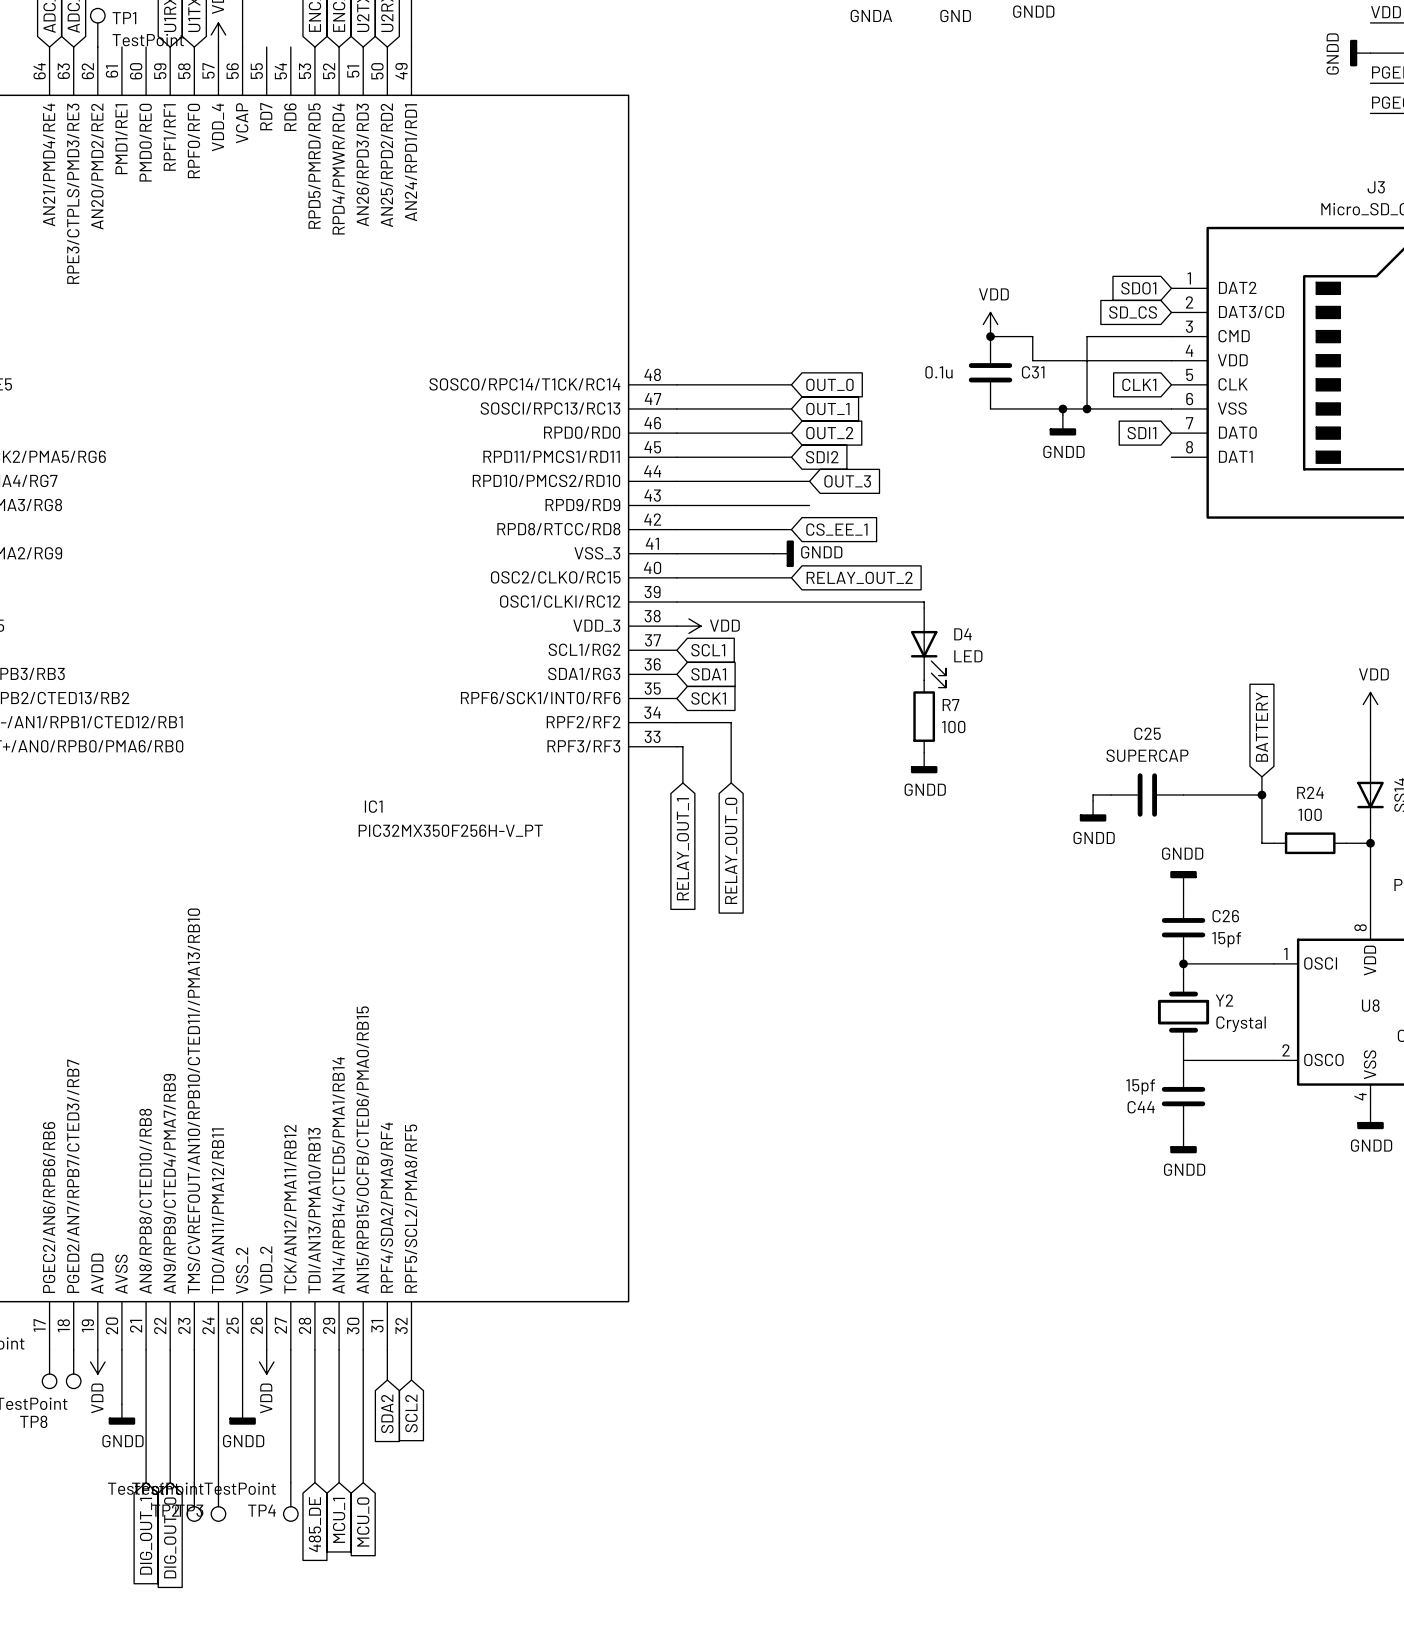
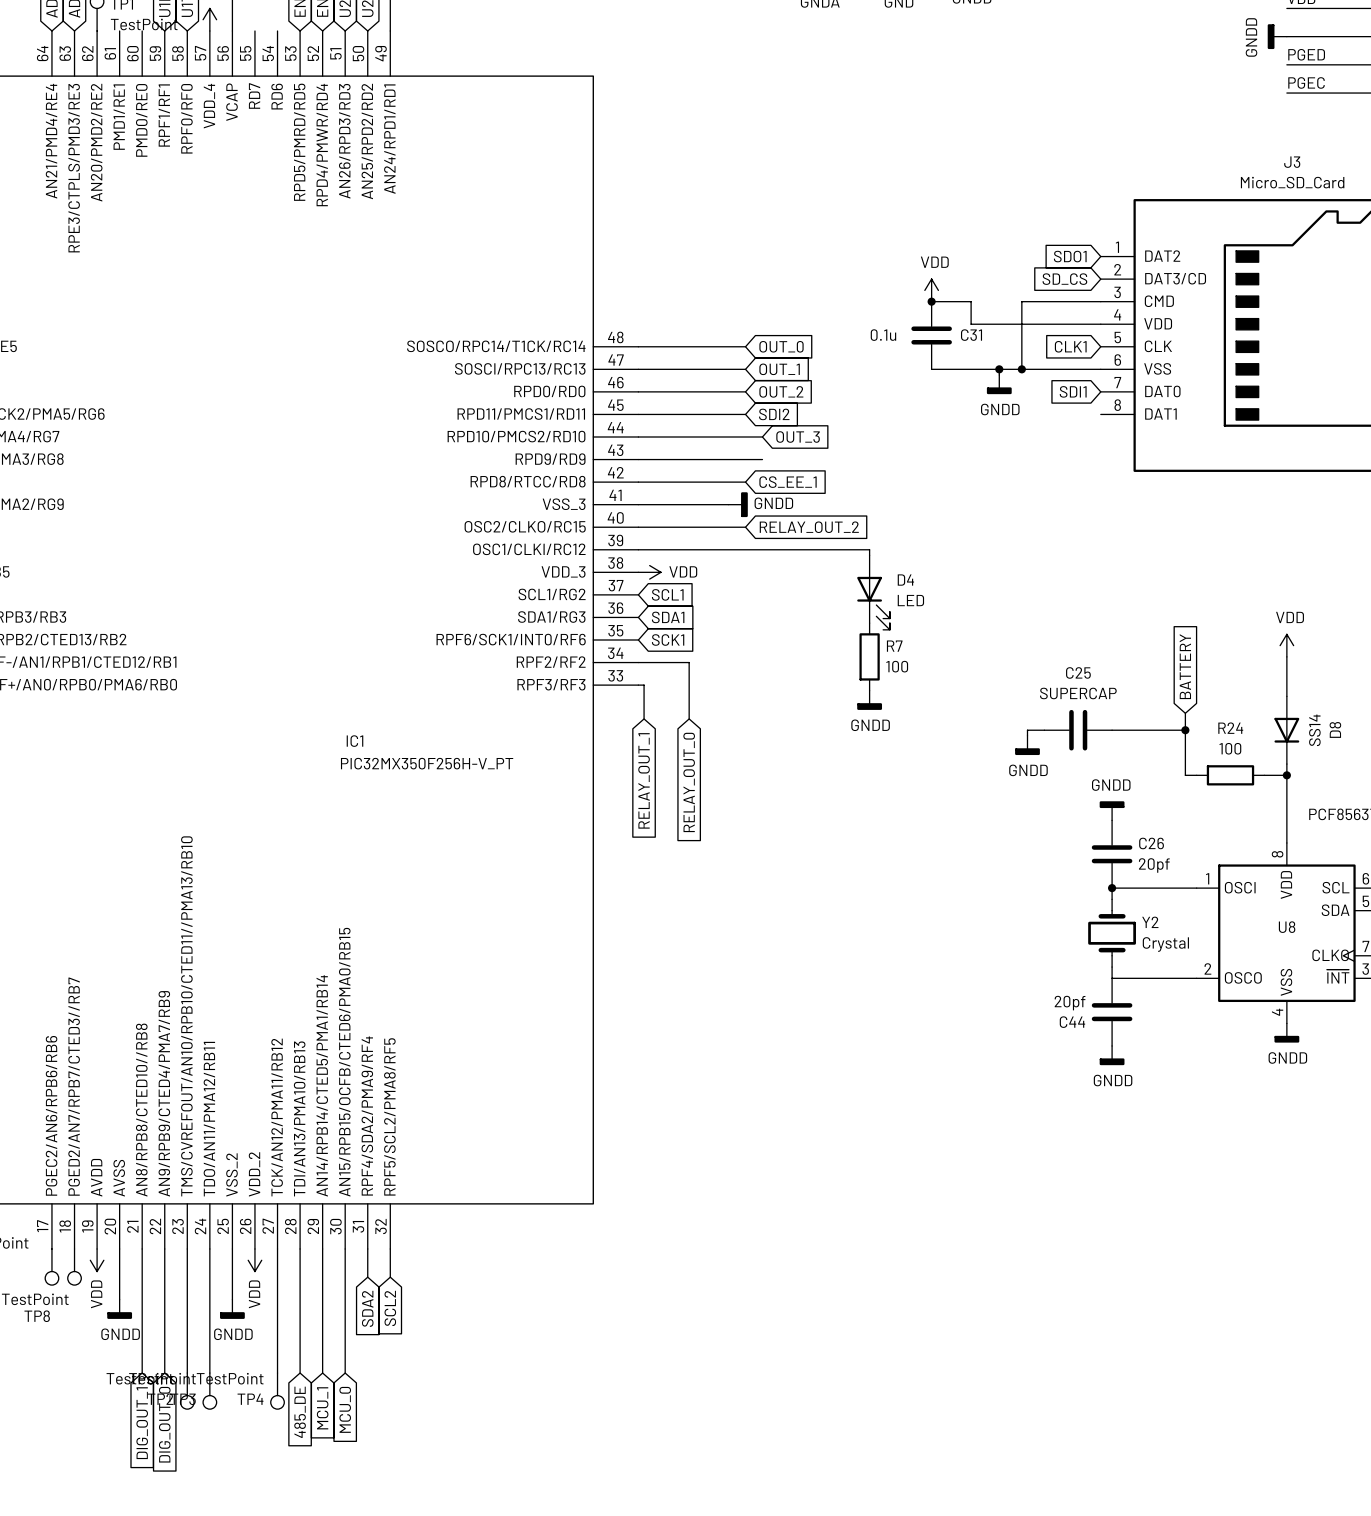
C26 value: 15pf (1226, 939) -> 20pf (1154, 865)
C44 value: 15pf (1140, 1086) -> 20pf (1070, 1003)

